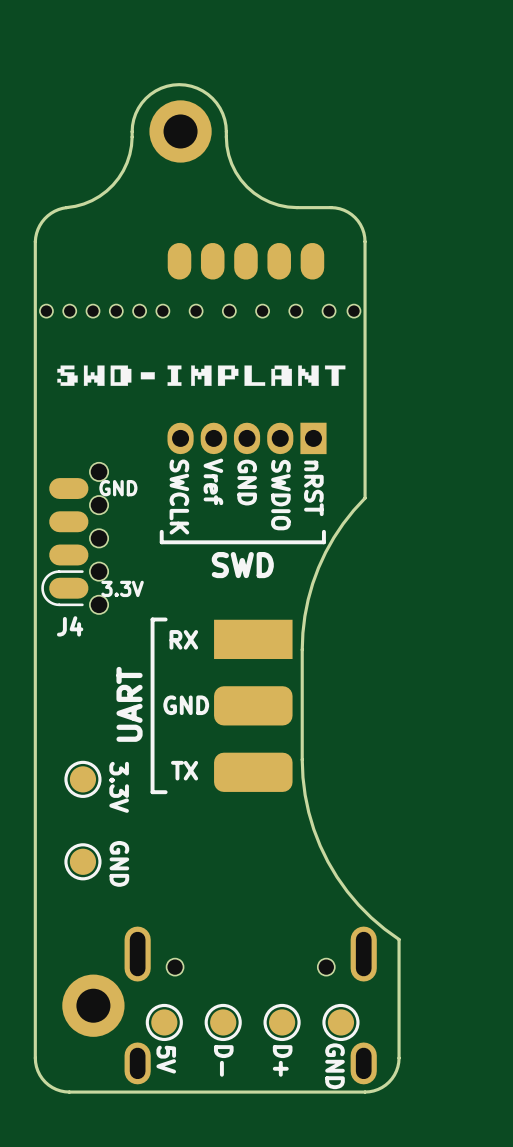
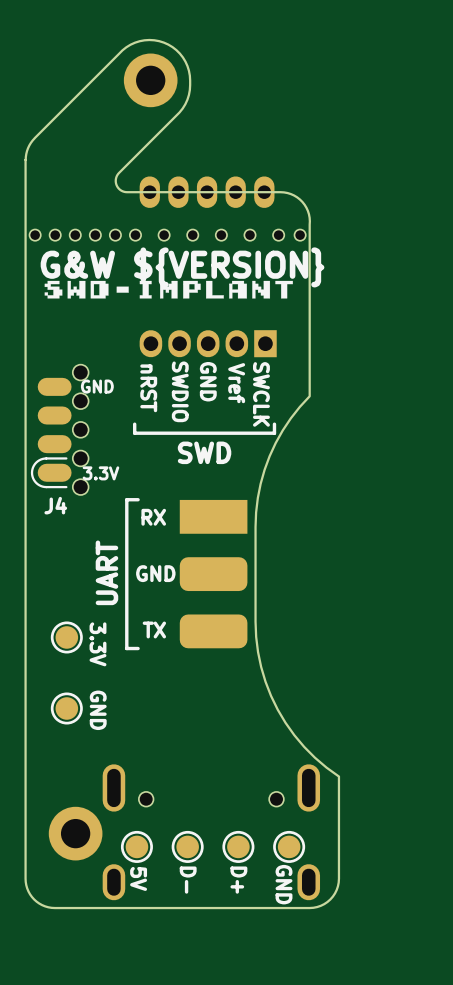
part footprint: [33, 83, 401, 1094] -> [24, 38, 341, 910]
text: none -> G&W ${VERSION} (182, 267)
text position: Vref (213, 481) -> Vref (236, 383)
text position: nRST (313, 488) -> nRST (148, 388)
text position: SWDIO (280, 495) -> SWDIO (180, 391)
text position: SWCLK (179, 497) -> SWCLK (261, 394)

